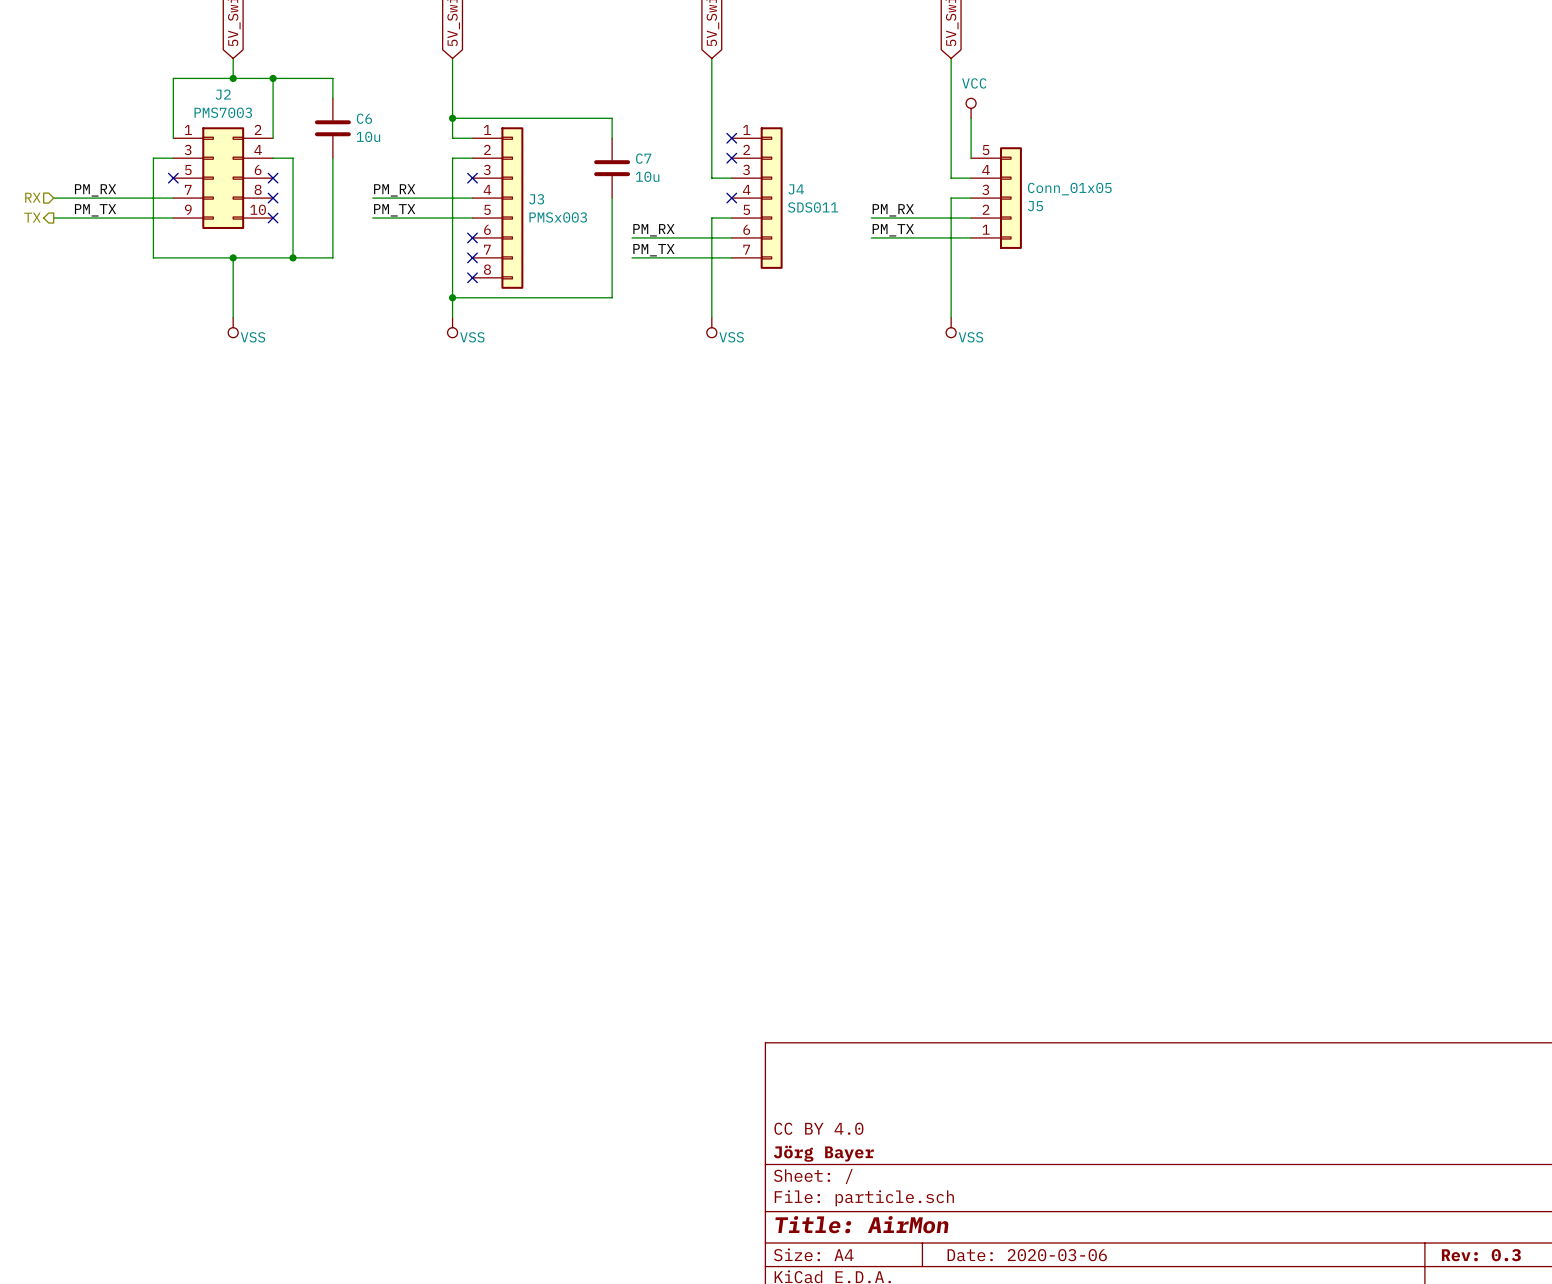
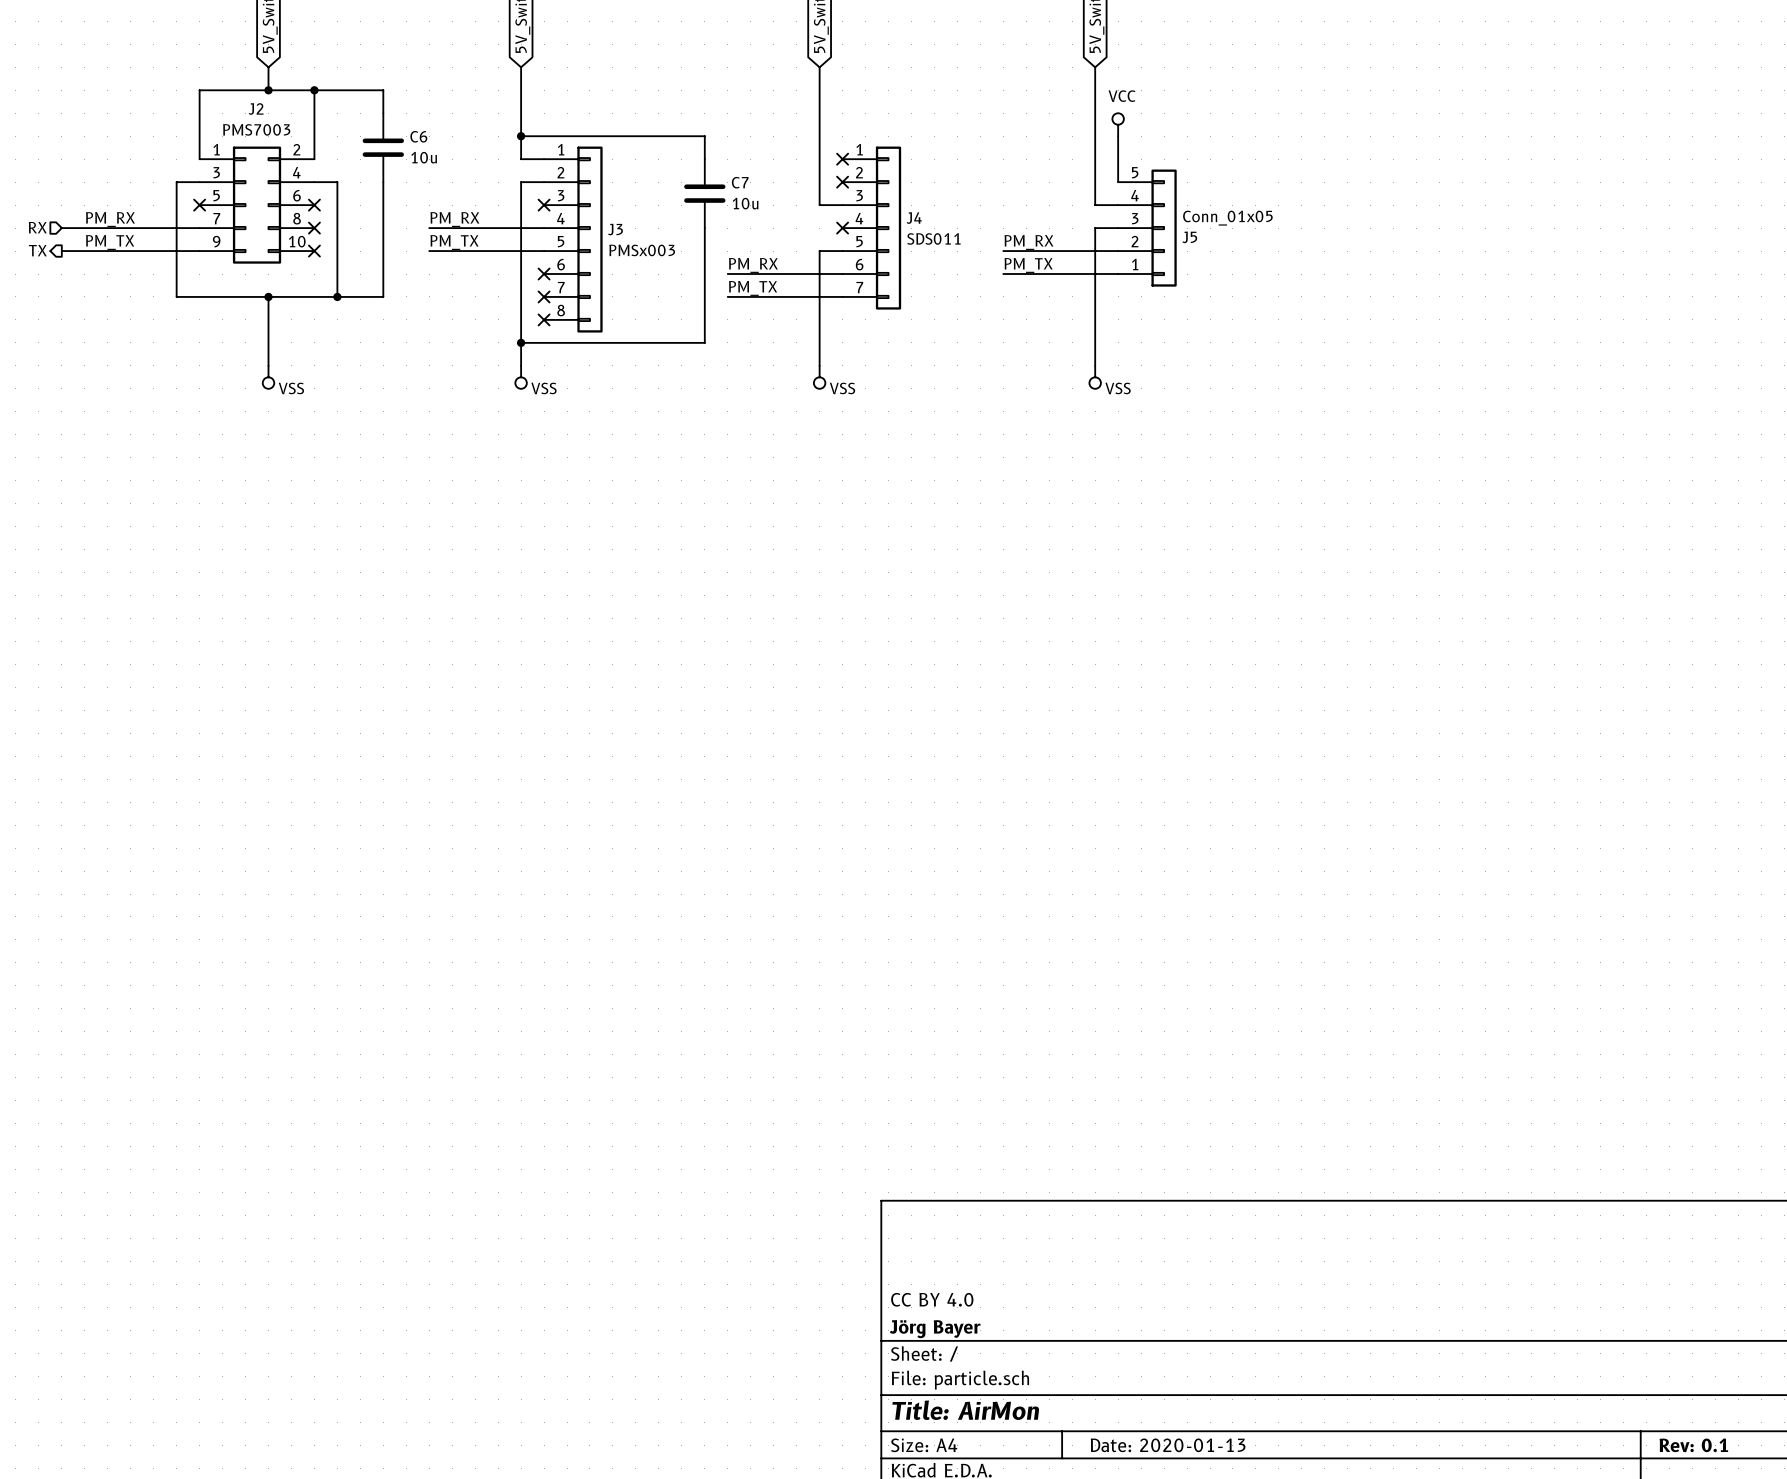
title block: Date: 2020-03-06 (1027, 1255) -> Date: 2020-01-13 (1168, 1445)
title block: Rev: 0.3 (1481, 1255) -> Rev: 0.1 (1693, 1445)

